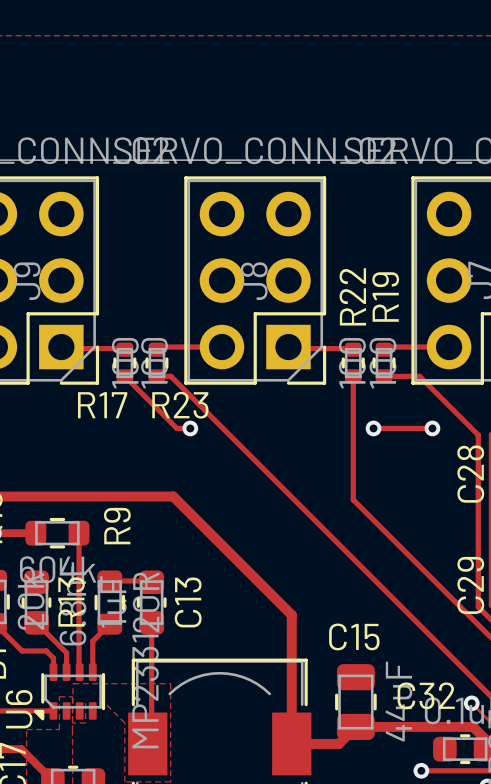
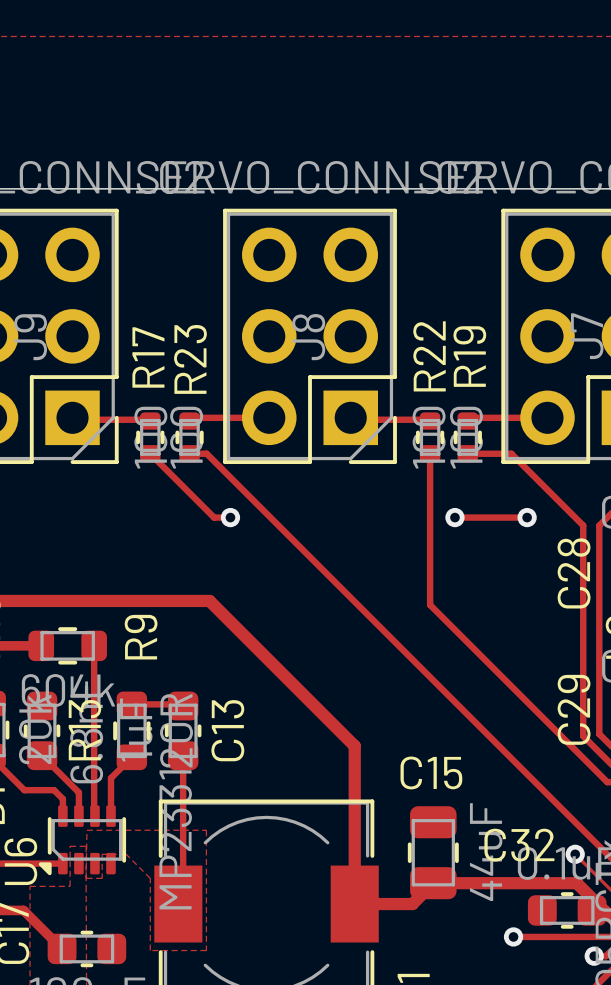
R17 name rotation: 0° (102, 405) -> 90° counterclockwise (148, 357)
R17 name position: R17 (102, 405) -> R17 (148, 357)
R23 name rotation: 0° (180, 405) -> 90° counterclockwise (190, 359)
R23 name position: R23 (180, 405) -> R23 (190, 359)

